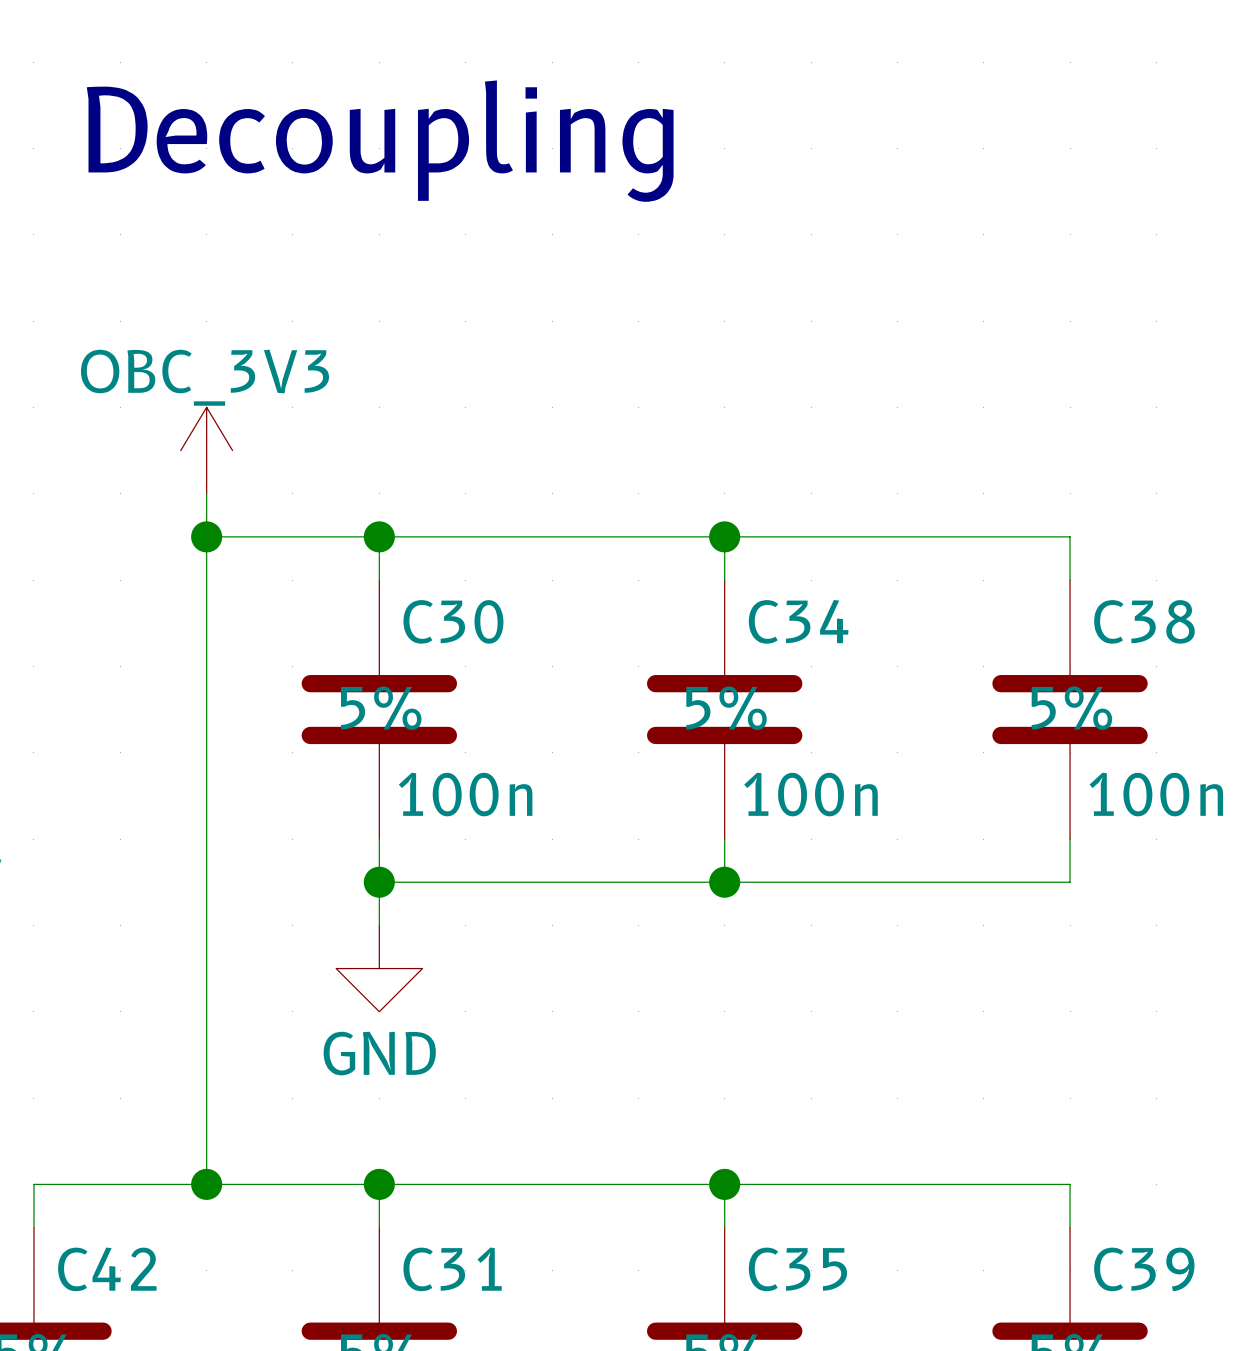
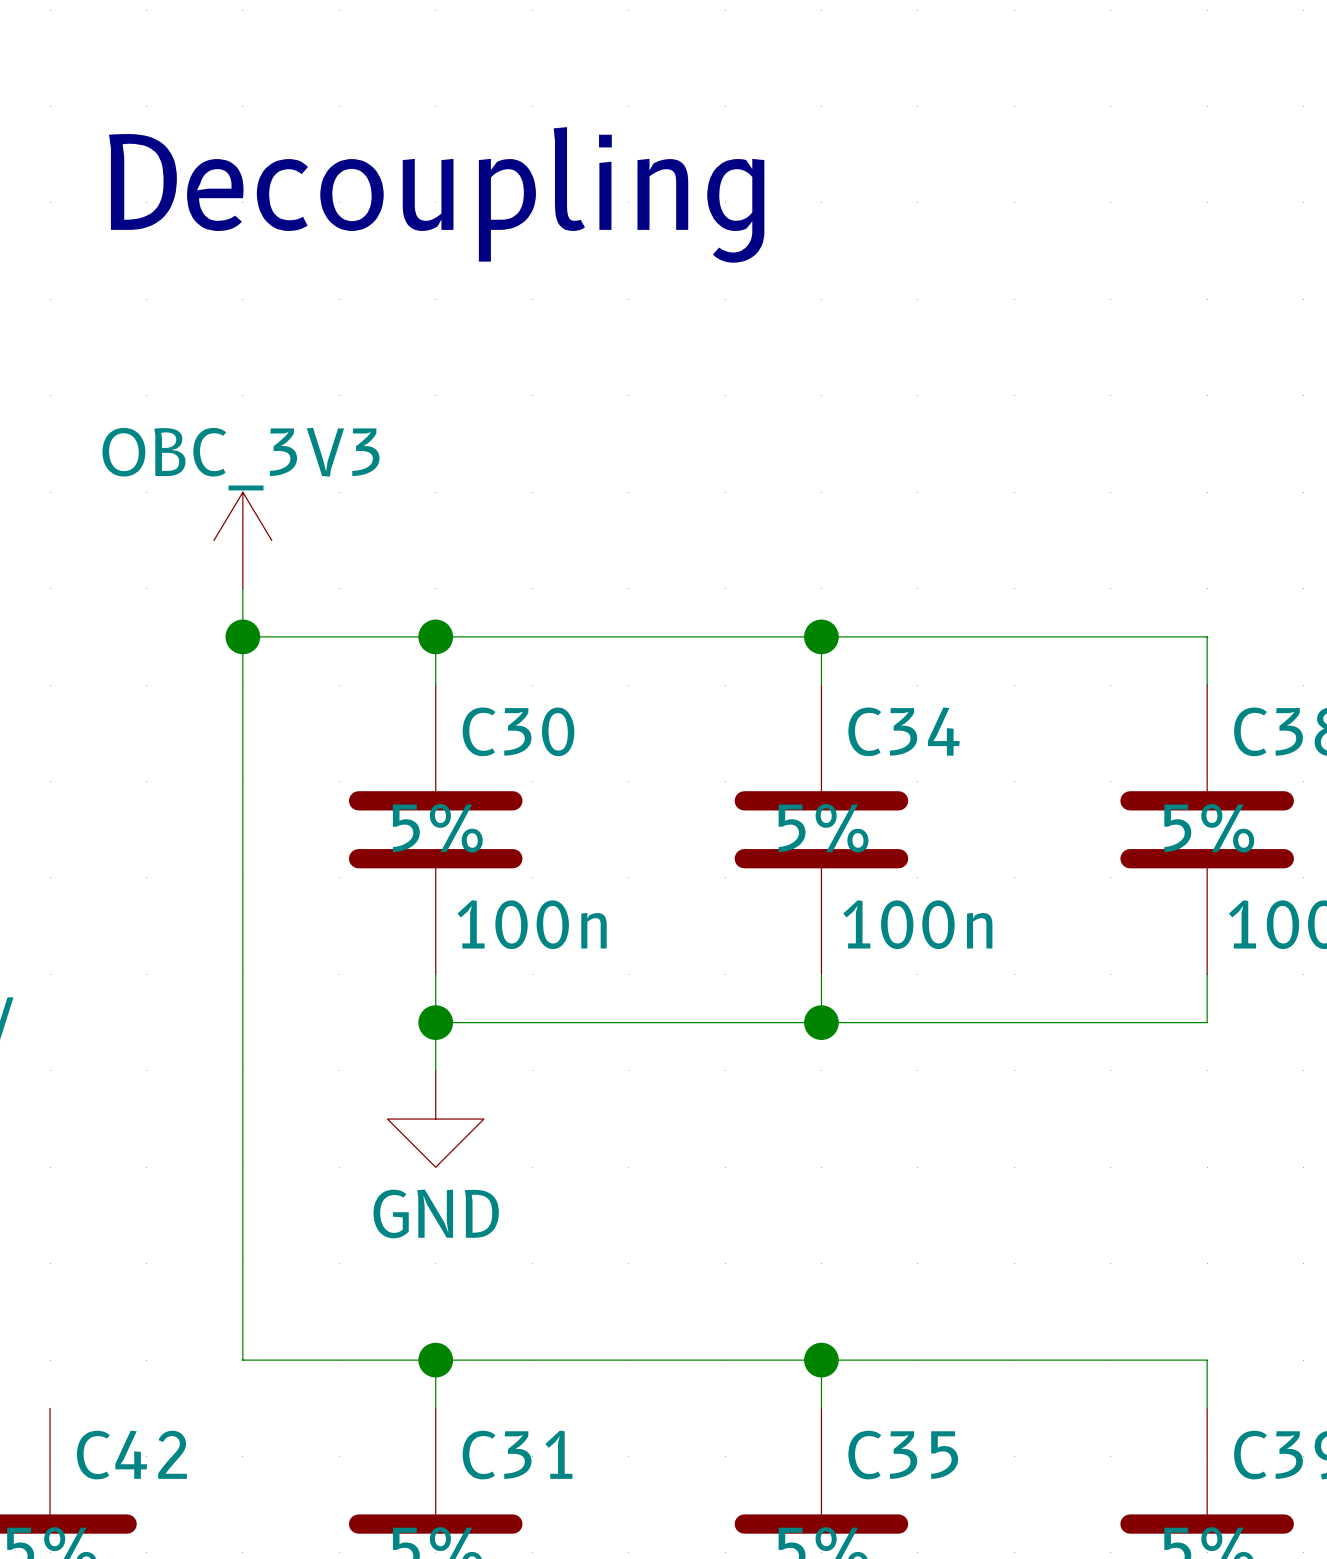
wire: (206, 1184) (33, 1184) (33, 1227) -> none
junction: (206, 1184) -> none

